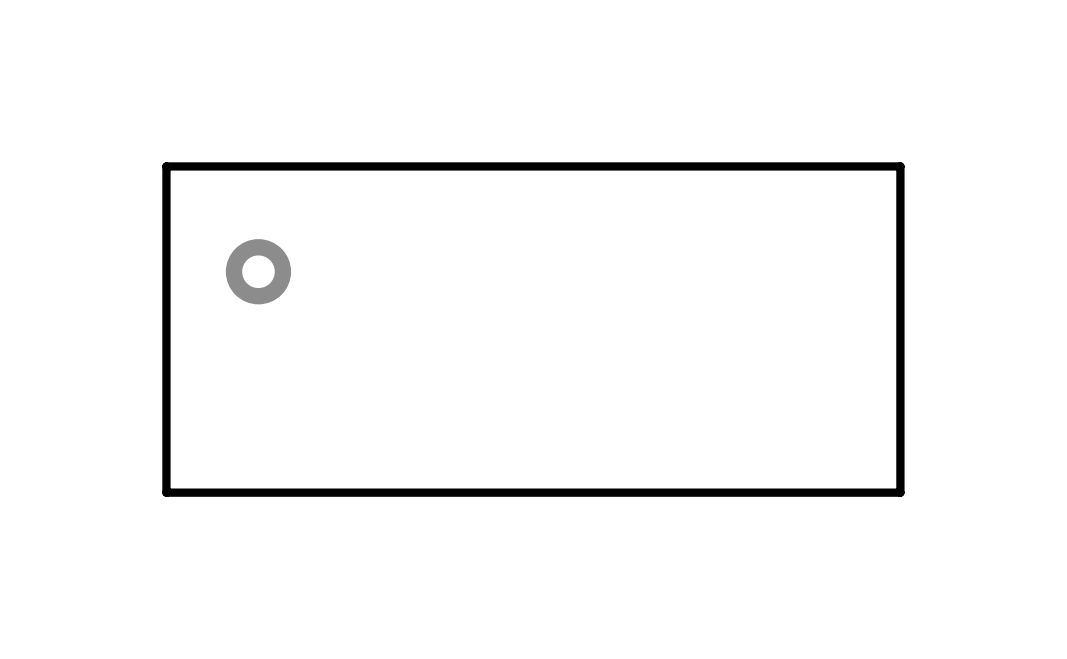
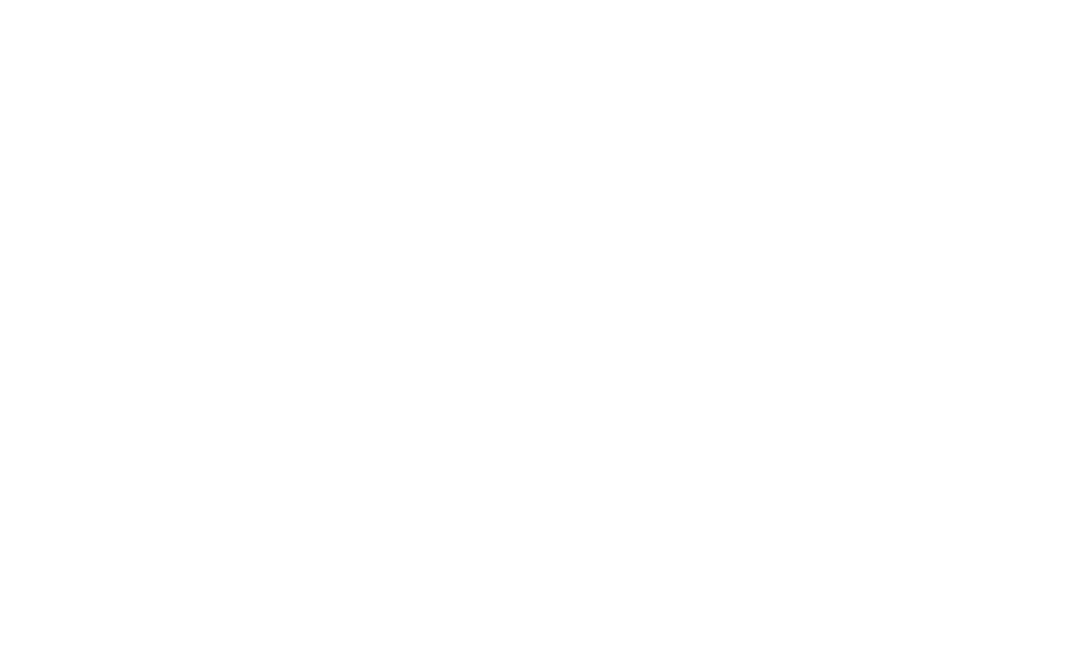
board edge: (900, 166) (166, 166) (166, 492) (900, 492) (900, 166) -> none
part: (258, 271) -> none

